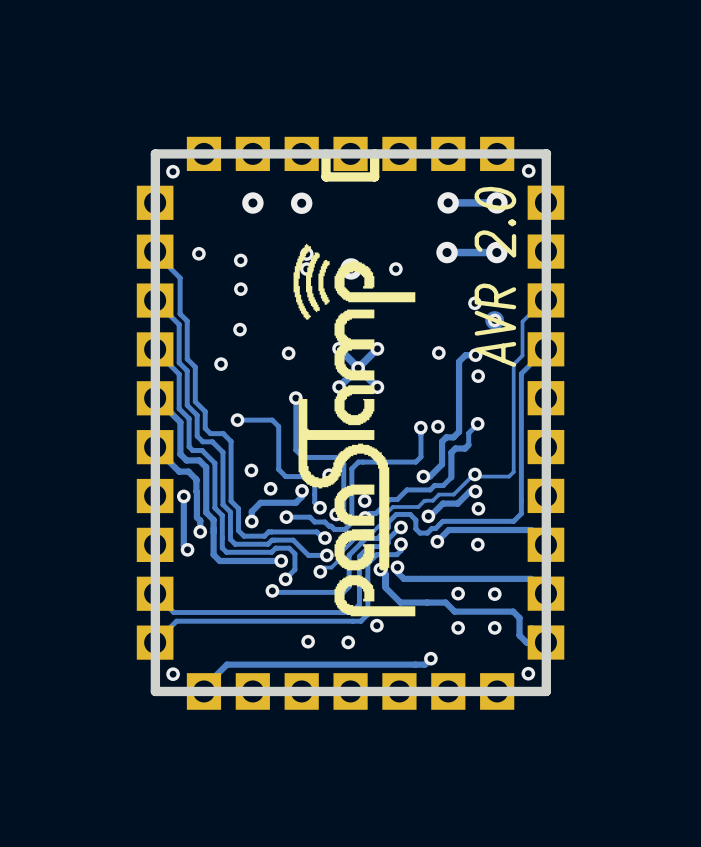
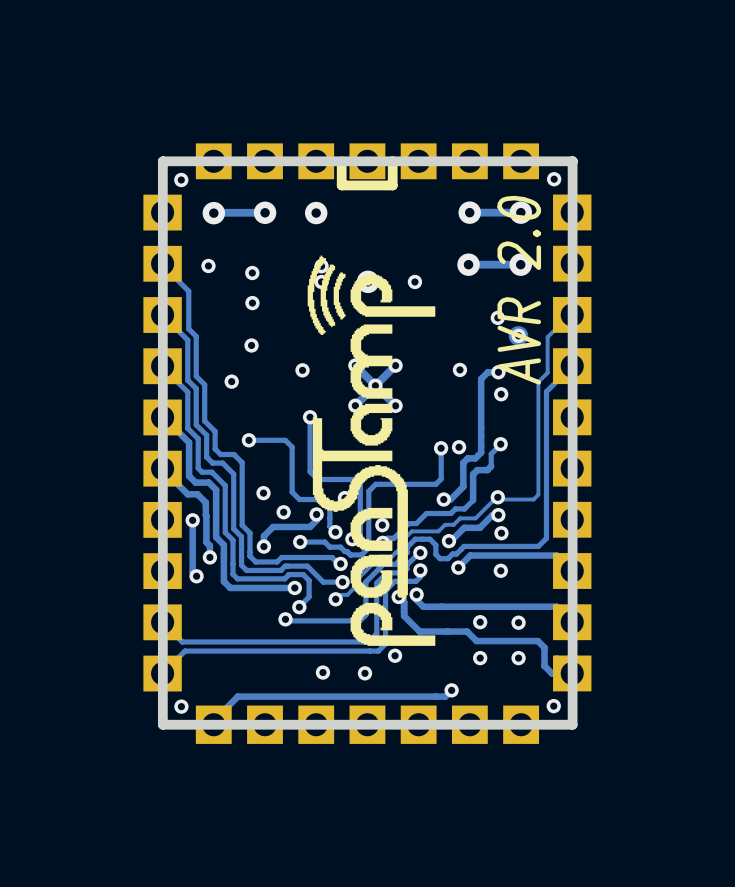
via: none -> (213, 213)
track: none -> (265, 212) (213, 213)

